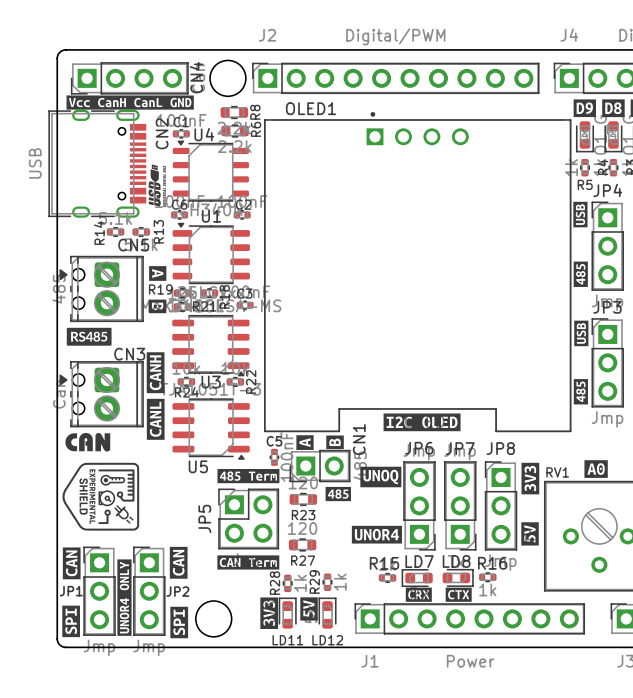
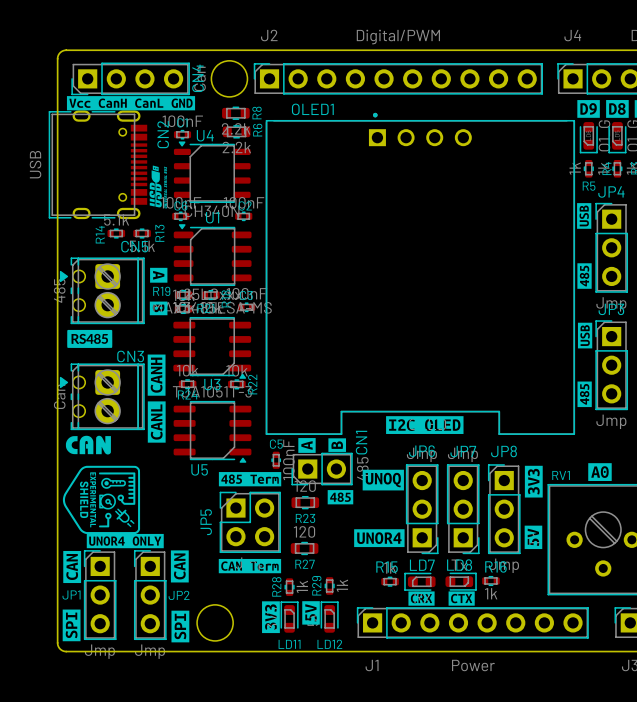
drawing: none -> [86, 533, 164, 549]
drawing: [117, 559, 132, 636] -> none

